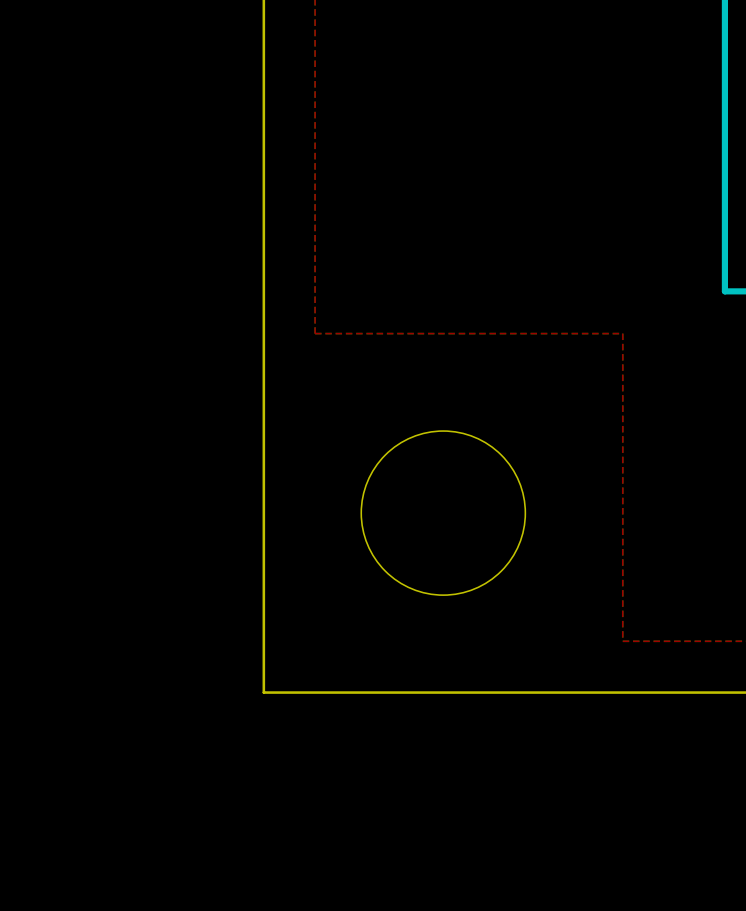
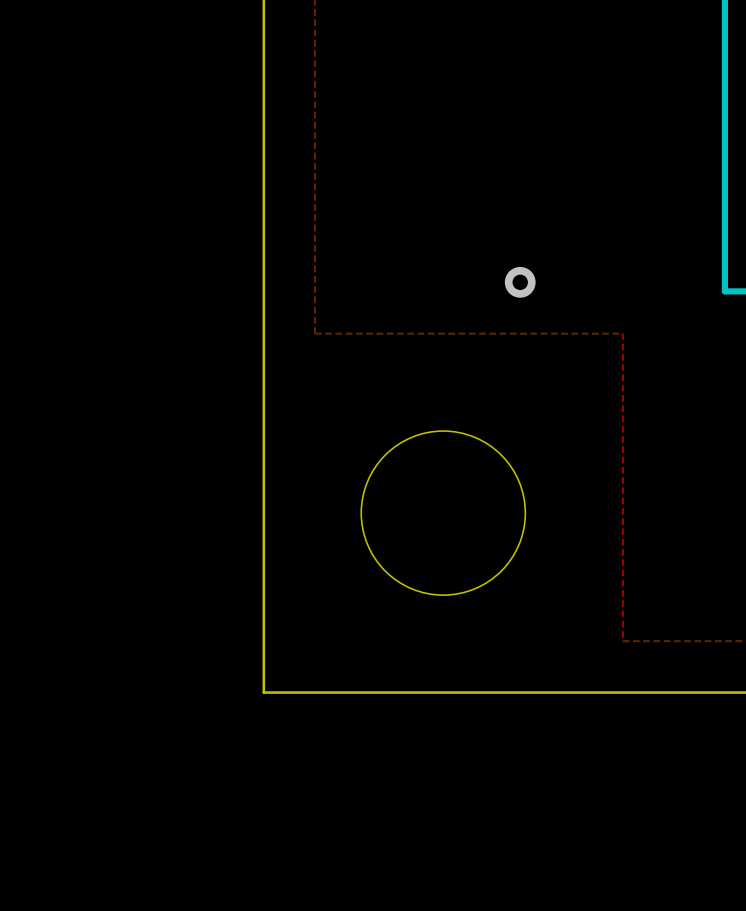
via: none -> (520, 282)

